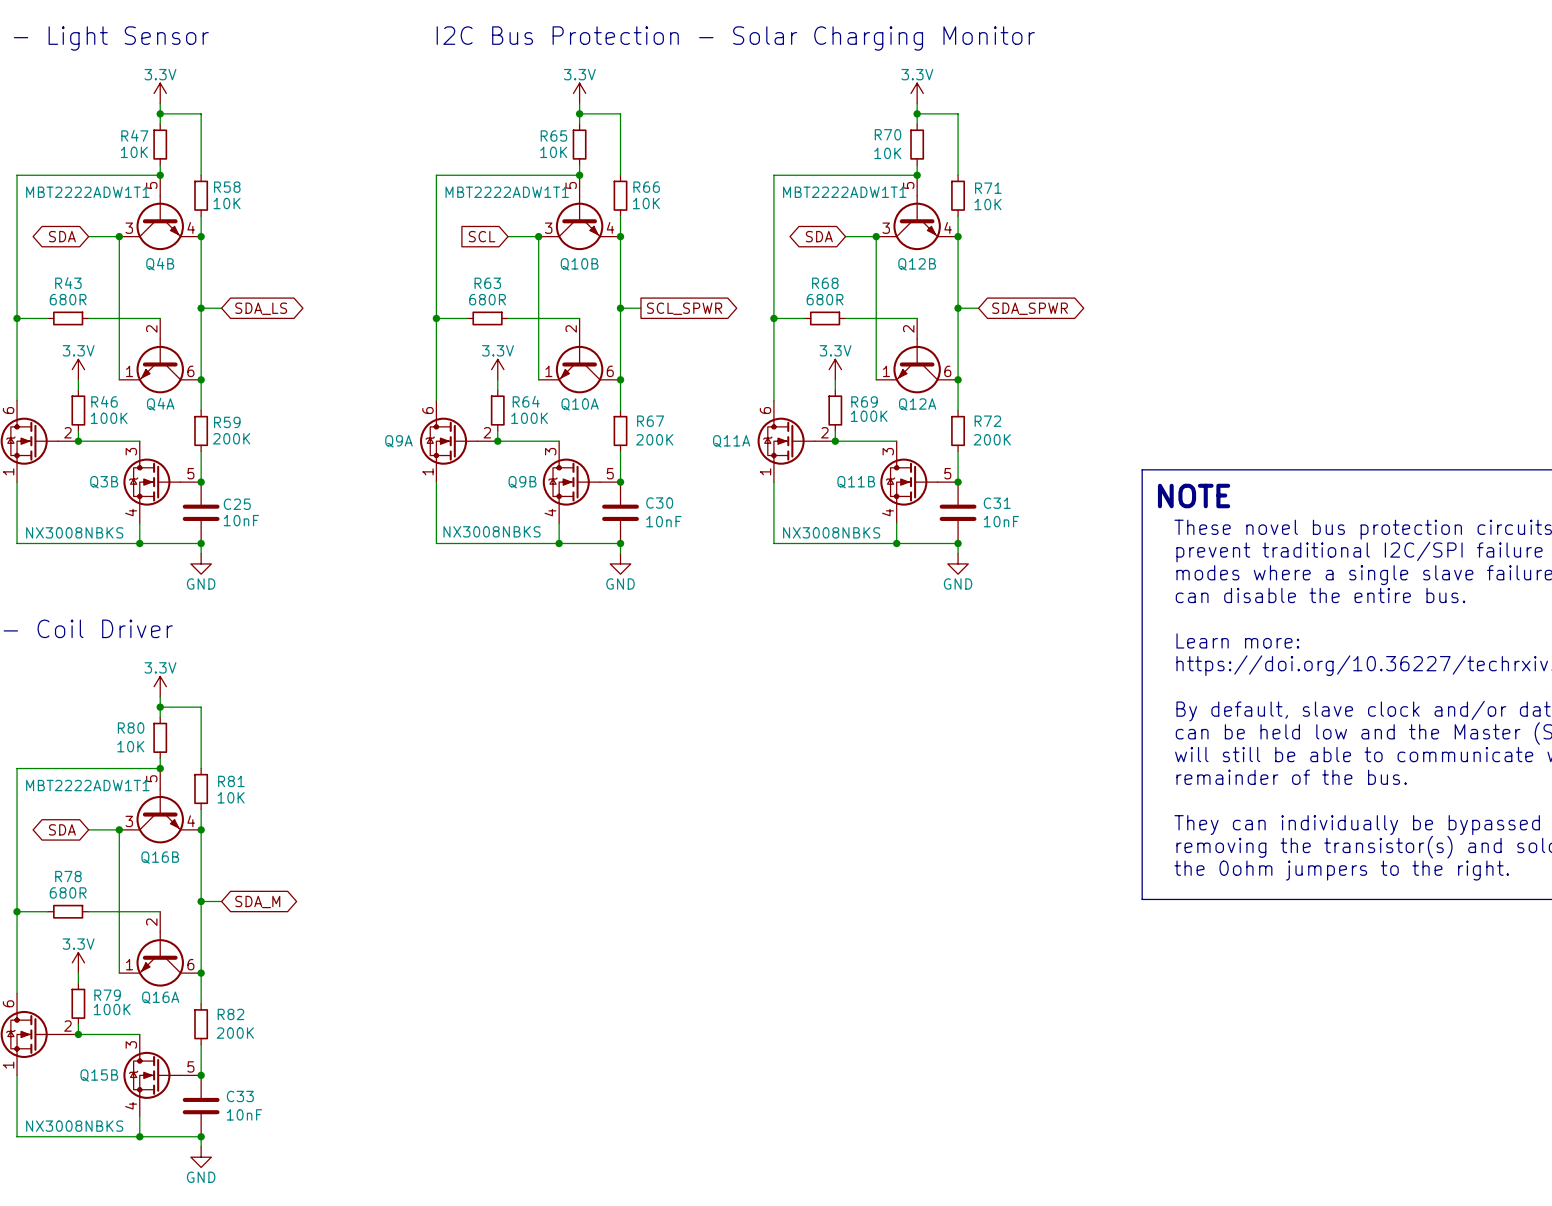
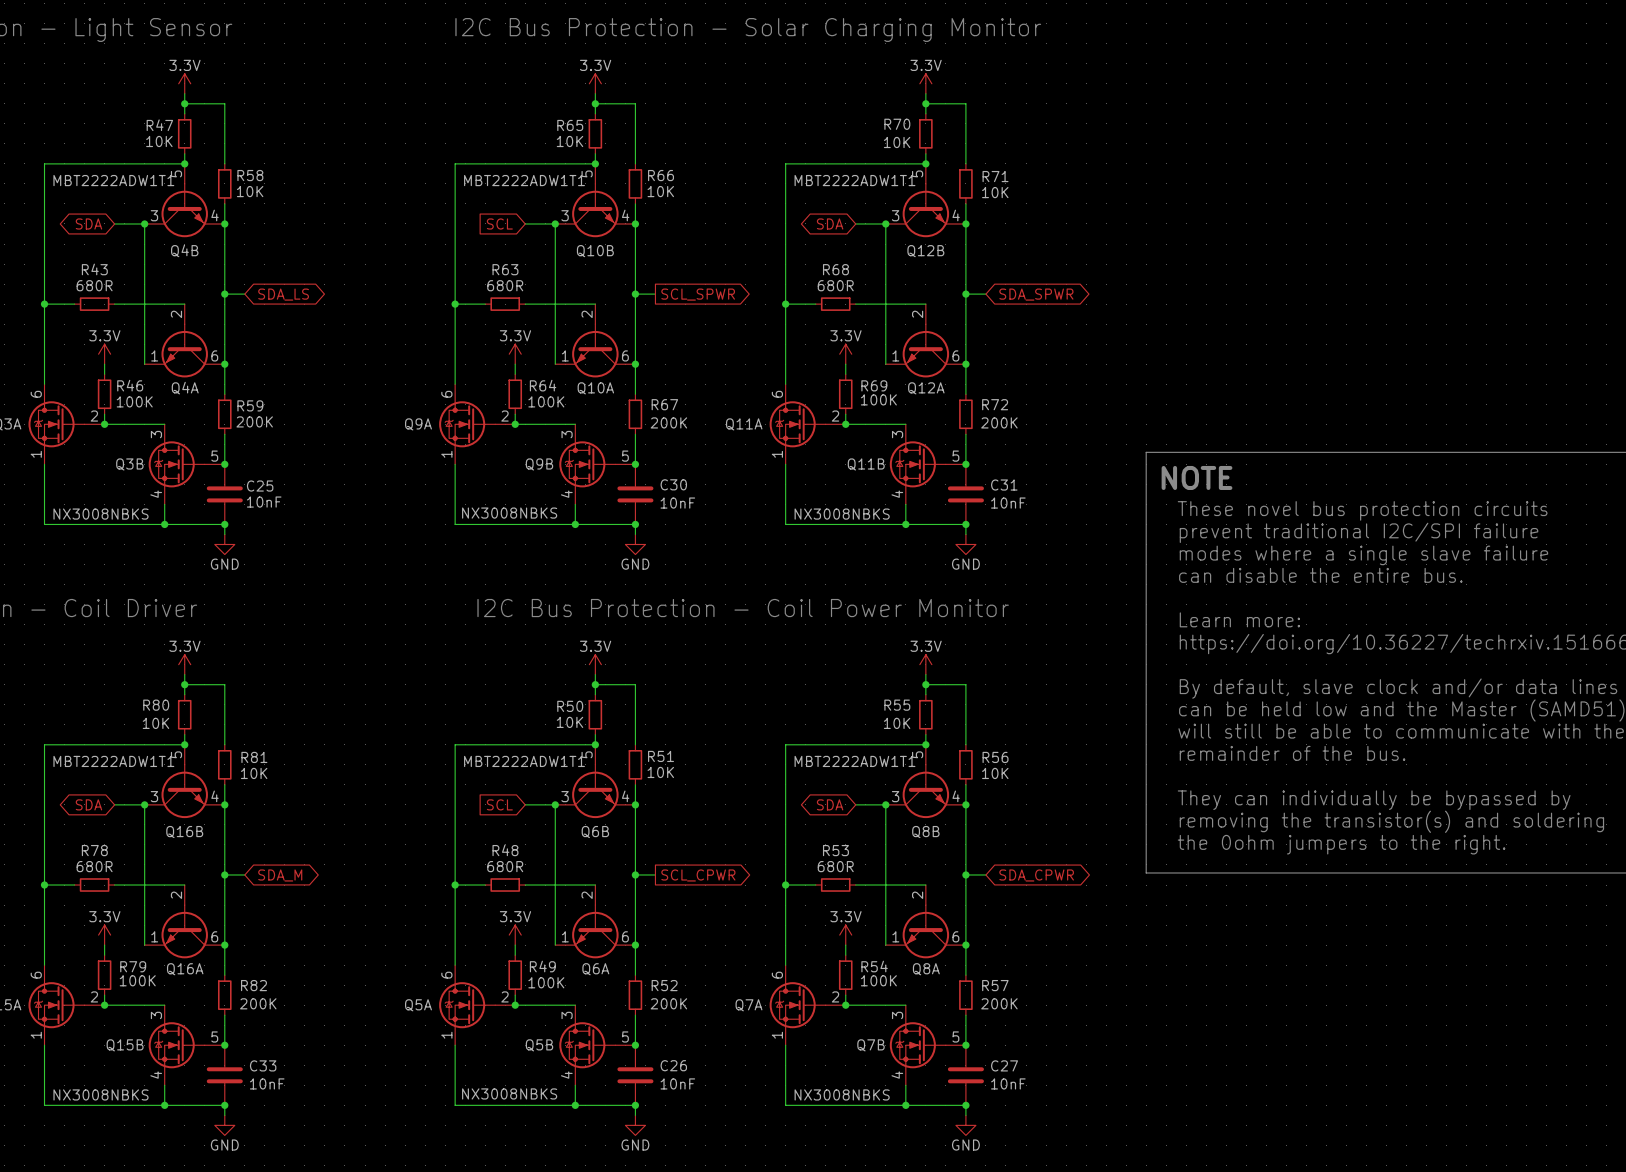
text: none -> I2C Bus Protection - Coil Power Monitor (743, 608)
power symbol: none -> 3.3V (595, 664)
power symbol: none -> 3.3V (925, 664)
wire: none -> (595, 674) (595, 694)
wire: none -> (925, 674) (925, 694)
wire: none -> (595, 684) (635, 684) (635, 744)
junction: none -> (595, 684)
wire: none -> (925, 684) (965, 684) (965, 744)
junction: none -> (925, 684)
R50: none -> 10K (595, 714)
R55: none -> 10K (925, 714)
wire: none -> (595, 734) (595, 744) (455, 744) (455, 965)
wire: none -> (925, 734) (925, 744) (785, 744) (785, 965)
junction: none -> (595, 744)
junction: none -> (925, 744)
R51: none -> 10K (635, 764)
R56: none -> 10K (965, 764)
Q6B: none -> MBT2222ADW1T1 (595, 781)
Q8B: none -> MBT2222ADW1T1 (925, 781)
wire: none -> (635, 784) (635, 975)
wire: none -> (965, 784) (965, 975)
global label: none -> SCL (499, 804)
wire: none -> (525, 804) (555, 804) (555, 945)
junction: none -> (555, 804)
junction: none -> (635, 804)
global label: none -> SDA (830, 804)
wire: none -> (855, 804) (885, 804) (885, 945)
junction: none -> (885, 804)
junction: none -> (965, 804)
wire: none -> (635, 874) (655, 874)
junction: none -> (635, 874)
global label: none -> SCL_CPWR (698, 875)
wire: none -> (965, 874) (985, 874)
junction: none -> (965, 874)
global label: none -> SDA_CPWR (1036, 875)
wire: none -> (455, 885) (485, 885)
junction: none -> (455, 885)
R48: none -> 680R (505, 885)
wire: none -> (525, 885) (595, 885)
wire: none -> (785, 885) (815, 885)
junction: none -> (785, 885)
R53: none -> 680R (835, 885)
wire: none -> (855, 885) (925, 885)
Q6A: none -> (595, 921)
Q8A: none -> (925, 921)
power symbol: none -> 3.3V (515, 935)
power symbol: none -> 3.3V (845, 935)
wire: none -> (515, 945) (515, 955)
junction: none -> (635, 945)
wire: none -> (845, 945) (845, 955)
junction: none -> (965, 945)
R49: none -> 100K (515, 975)
R54: none -> 100K (845, 975)
wire: none -> (515, 995) (515, 1005) (575, 1005)
R52: none -> 200K (635, 995)
wire: none -> (845, 995) (845, 1005) (905, 1005)
R57: none -> 200K (965, 995)
Q5A: none -> NX3008NBKS (477, 1005)
junction: none -> (515, 1005)
Q7A: none -> NX3008NBKS (807, 1005)
junction: none -> (845, 1005)
wire: none -> (635, 1015) (635, 1045)
wire: none -> (965, 1015) (965, 1045)
wire: none -> (455, 1045) (455, 1105) (635, 1105) (635, 1115)
Q5B: none -> (597, 1045)
junction: none -> (635, 1045)
wire: none -> (785, 1045) (785, 1105) (965, 1105) (965, 1115)
Q7B: none -> (927, 1045)
junction: none -> (965, 1045)
C26: none -> 10nF (635, 1075)
C27: none -> 10nF (965, 1075)
wire: none -> (575, 1085) (575, 1105)
wire: none -> (905, 1085) (905, 1105)
junction: none -> (575, 1105)
junction: none -> (635, 1105)
junction: none -> (905, 1105)
junction: none -> (965, 1105)
power symbol: none -> GND (635, 1125)
power symbol: none -> GND (965, 1125)

